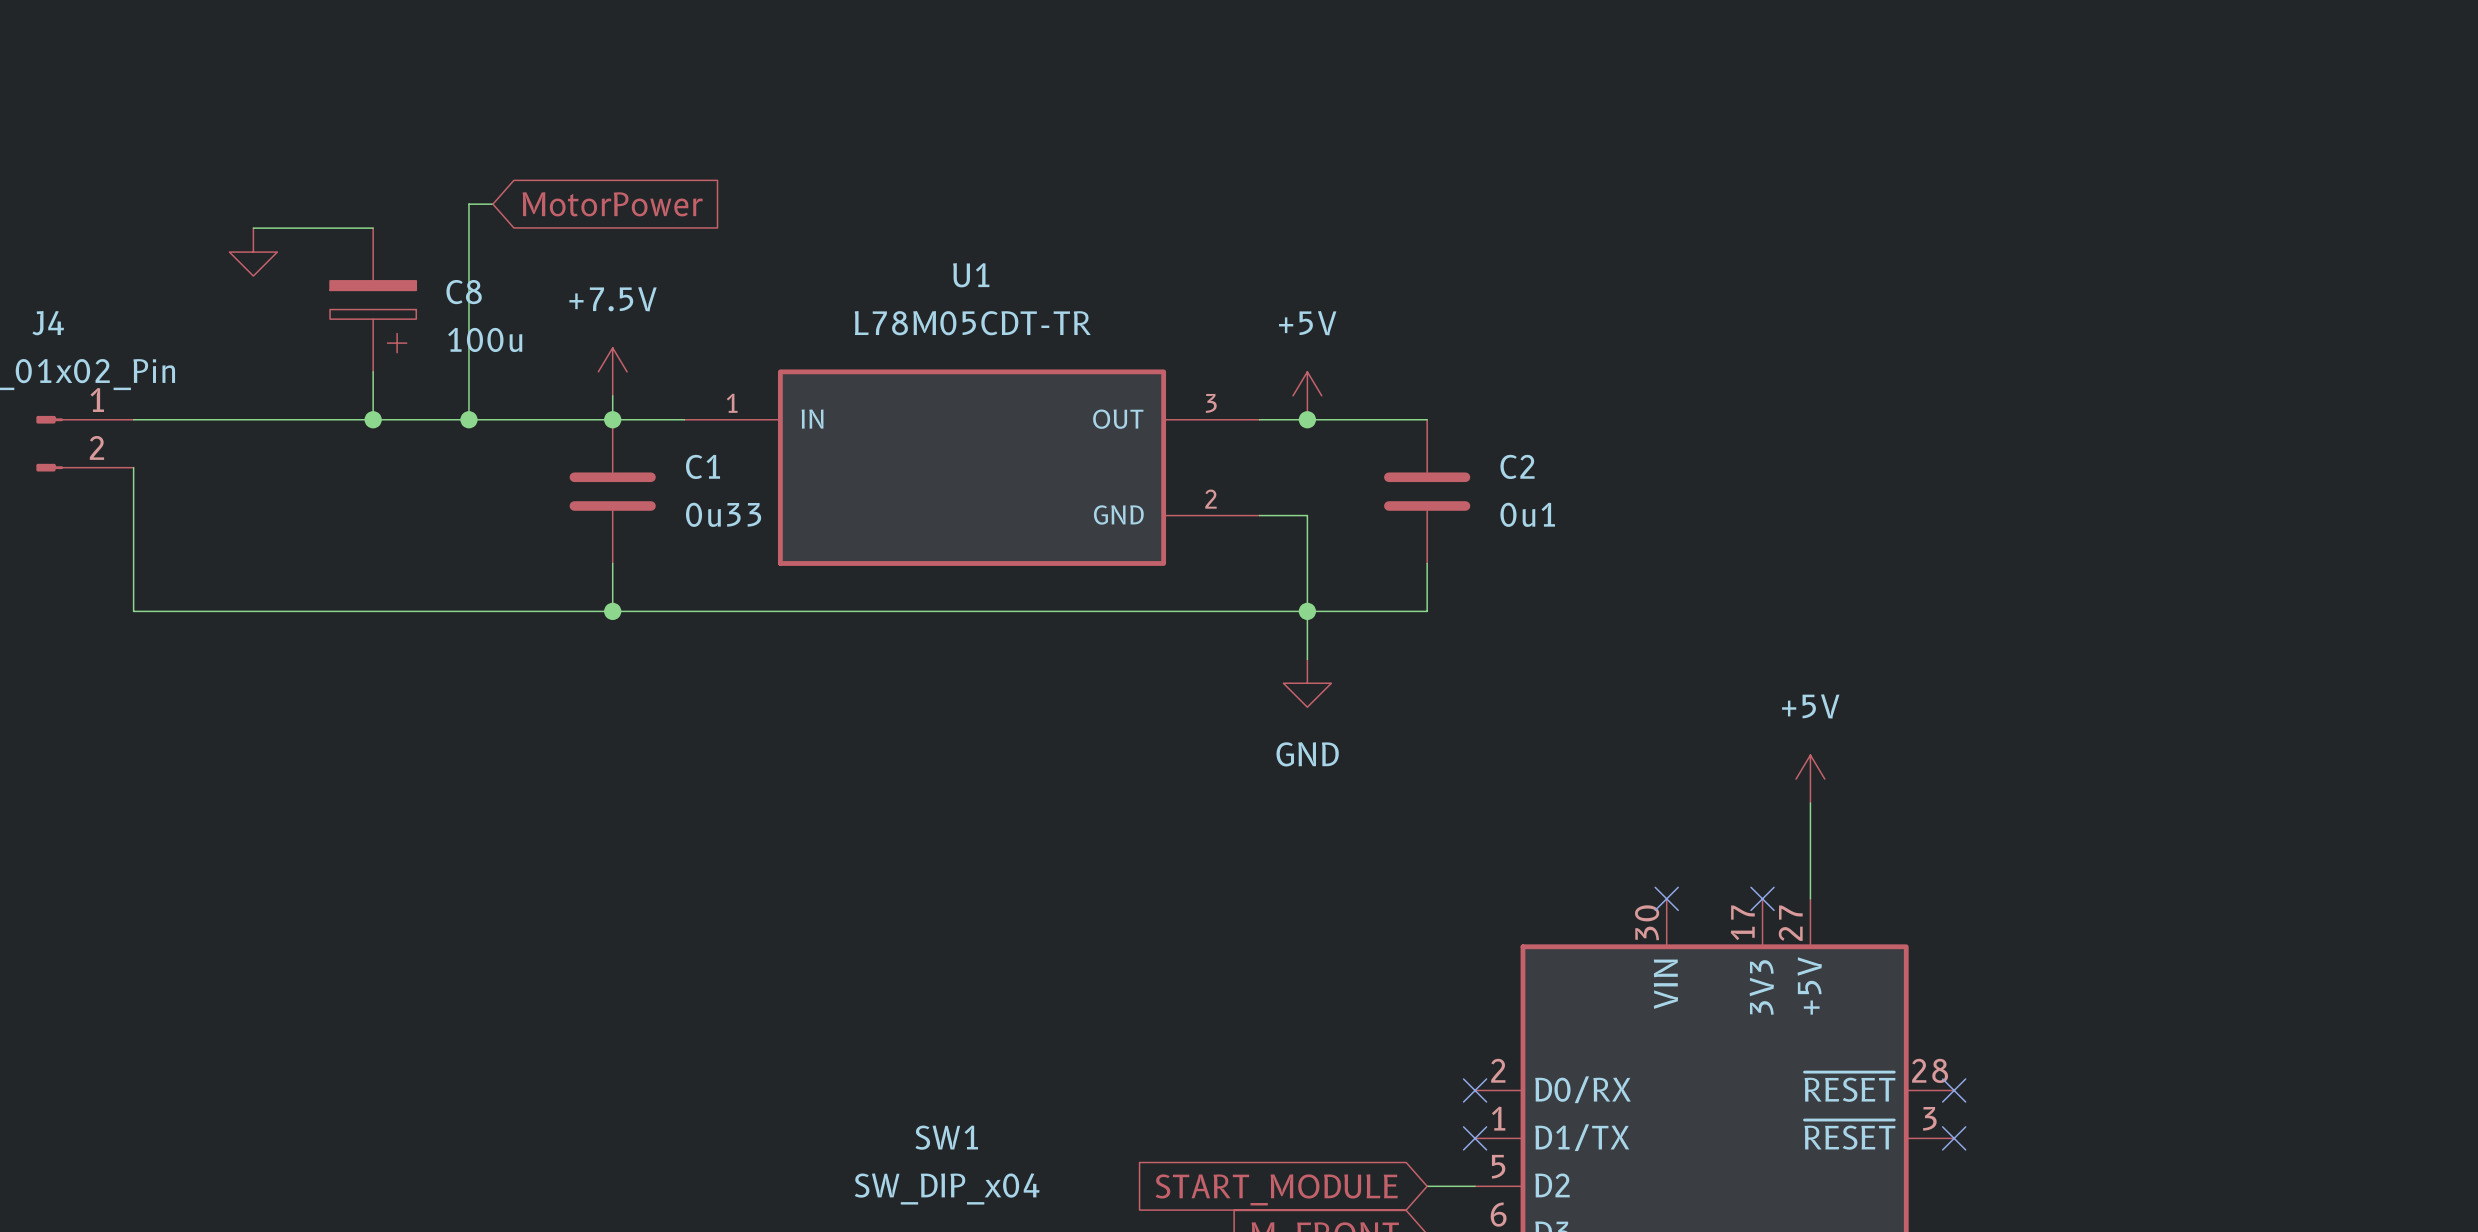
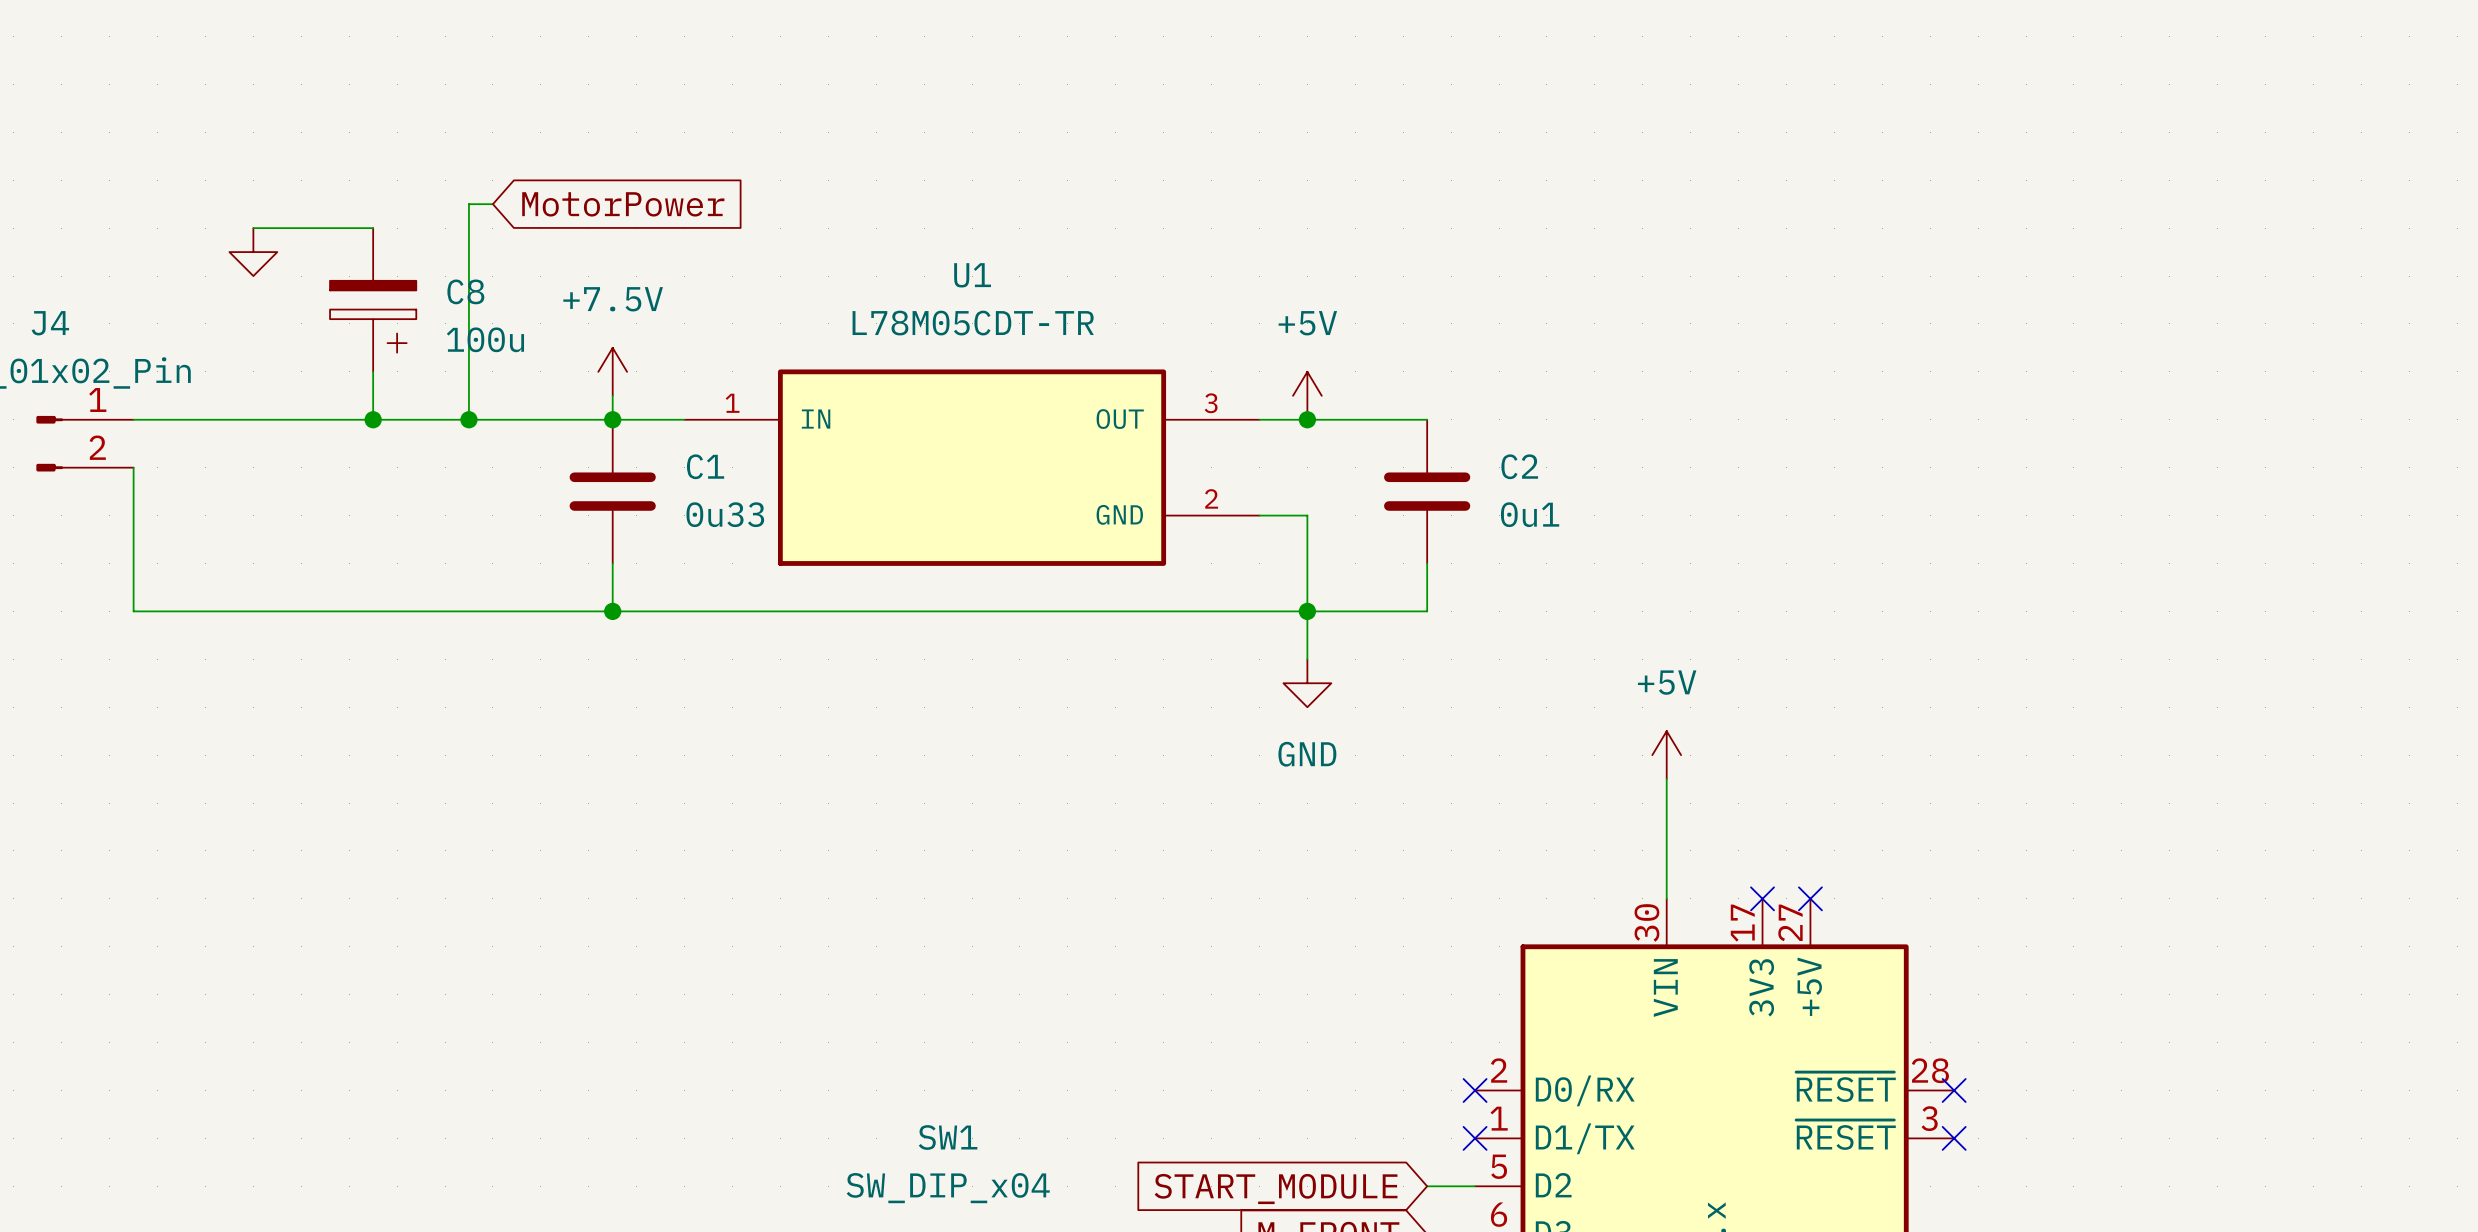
wire: none -> (1666, 779) (1666, 898)
power symbol position: +5V (1810, 779) -> +5V (1666, 755)
wire: (1810, 803) (1810, 898) -> none
no-connect mark: (1666, 898) -> none
no-connect mark: none -> (1810, 898)

